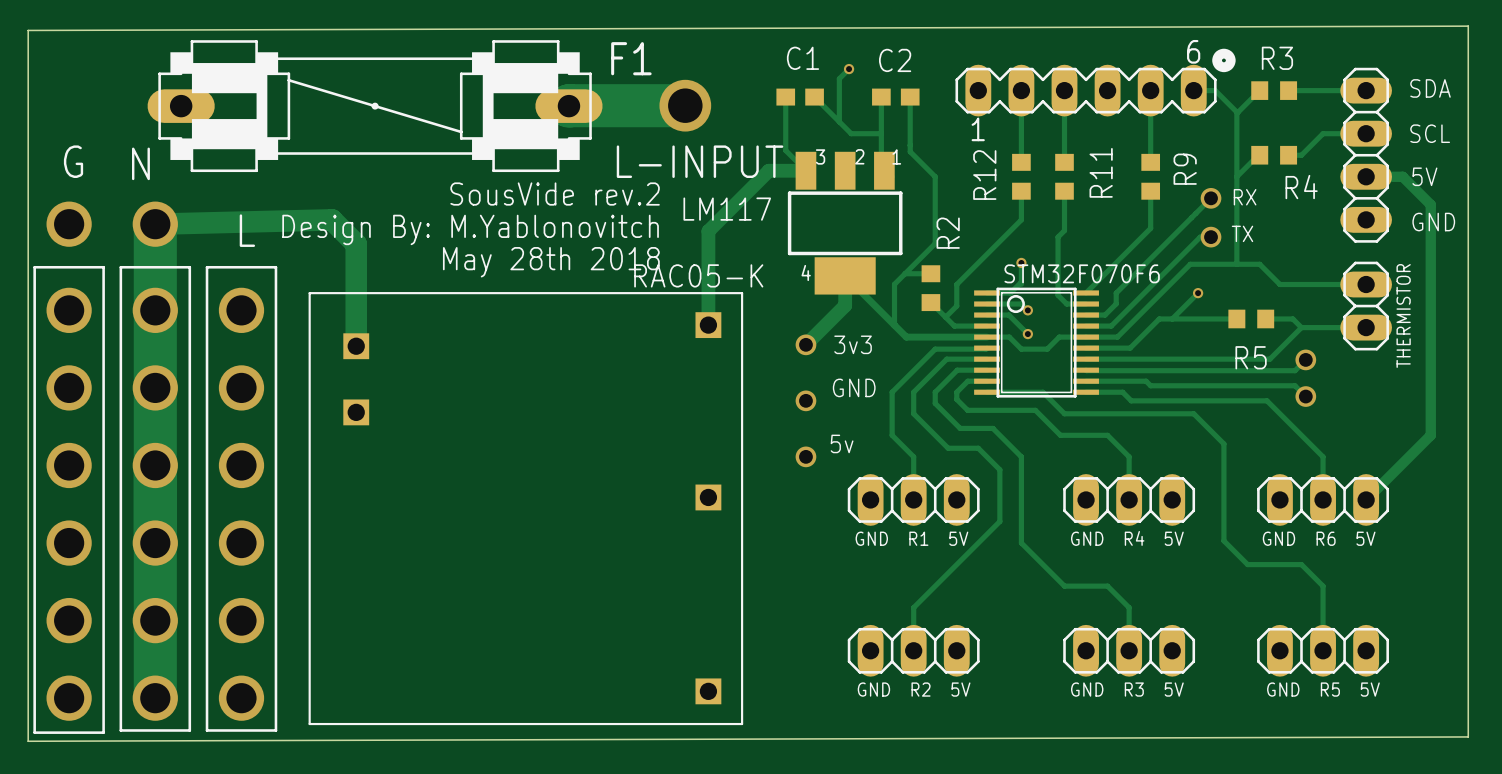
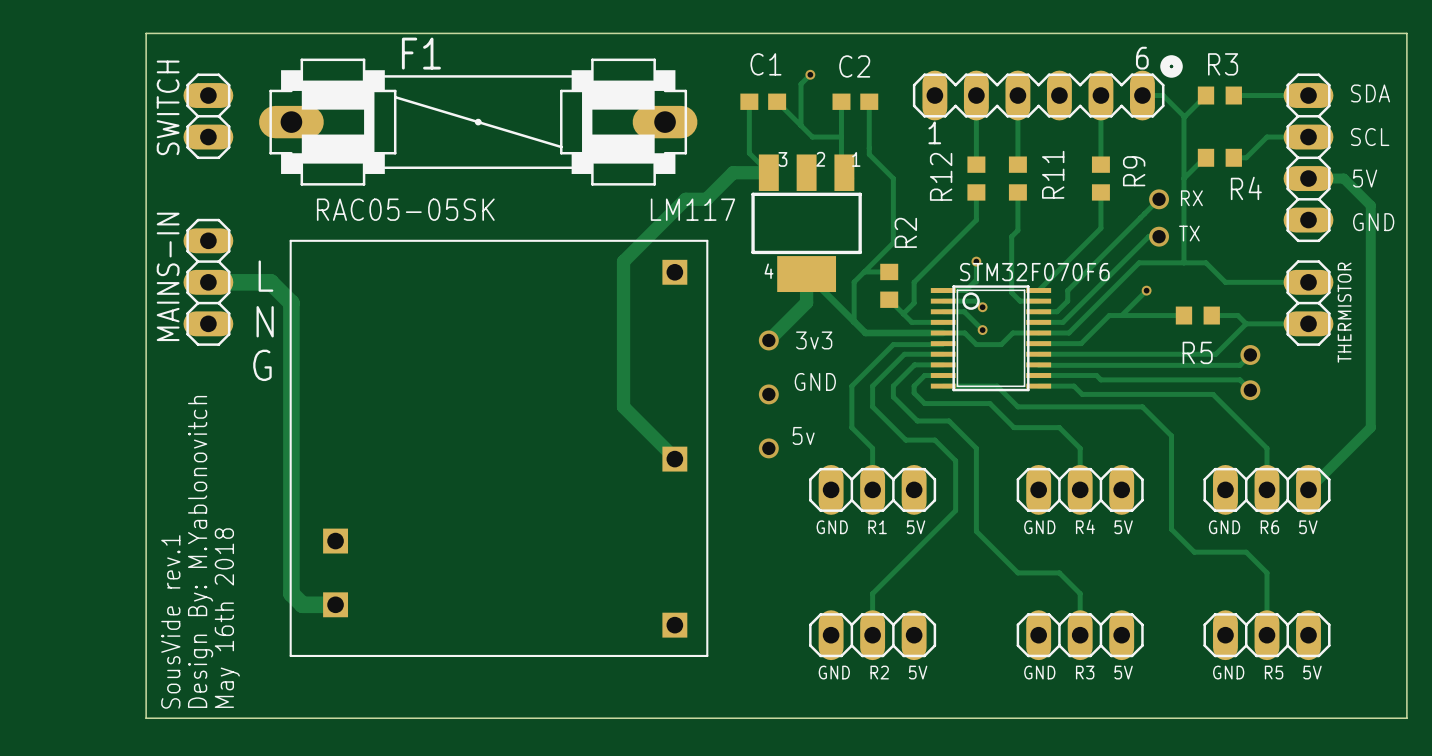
board edge: (1468, 26) (28, 30) (28, 741) (1468, 736) -> (1406, 33) (146, 33) (146, 718) (1406, 718)
F1 name position: F1 (631, 58) -> F1 (421, 53)
track: (685, 105) (568, 106) -> none
via: (685, 105) -> none
F1 position: (375, 106) -> (478, 122)
SWITCH: none -> (208, 116)
text position: G (73, 161) -> G (262, 365)
text: L-INPUT (700, 161) -> none
text position: N (140, 163) -> N (265, 321)
text: SousVide rev.2 (555, 194) -> none
track: (741, 198) (708, 231) (708, 325) -> (706, 199) (685, 199) (623, 261) (623, 406) (674, 459)
via: (69, 224) -> none
via: (155, 224) -> none
text: Design By: M.Yablonovitch (470, 229) -> none
text position: L (247, 230) -> L (265, 276)
text: May 28th 2018 (551, 262) -> none
line: (34, 267) (103, 267) (103, 732) (34, 732) (34, 267) -> none
line: (120, 267) (189, 267) (189, 730) (120, 730) (120, 267) -> none
line: (207, 267) (275, 267) (275, 730) (207, 730) (207, 267) -> none
track: none -> (208, 282) (270, 282) (291, 303) (291, 593) (302, 604) (334, 604)
MAINS-IN: none -> (208, 282)
via: (69, 310) -> none
via: (155, 310) -> none
via: (241, 310) -> none
track: (356, 346) (356, 244) (331, 219) (155, 224) (155, 698) -> none
via: (69, 387) -> none
via: (155, 387) -> none
via: (241, 387) -> none
RAC05-05SK: none -> (498, 448)
via: (69, 465) -> none
via: (155, 465) -> none
via: (241, 465) -> none
RAC05-K: (525, 508) -> none
via: (69, 543) -> none
via: (155, 543) -> none
via: (241, 543) -> none
text: none -> Design By: M.Yablonovitch (200, 551)
via: (69, 620) -> none
via: (155, 620) -> none
via: (241, 620) -> none
text: none -> May 16th 2018 (227, 618)
text: none -> SousVide rev.1 (170, 621)
via: (69, 698) -> none
via: (155, 698) -> none
via: (241, 698) -> none

